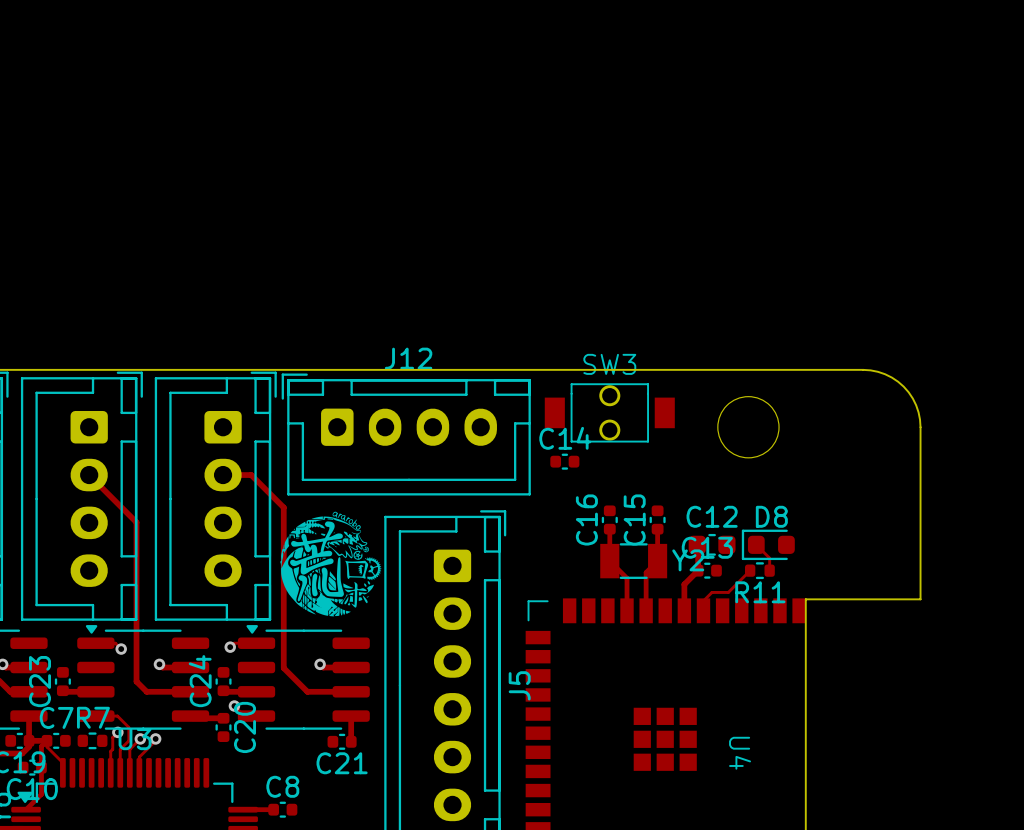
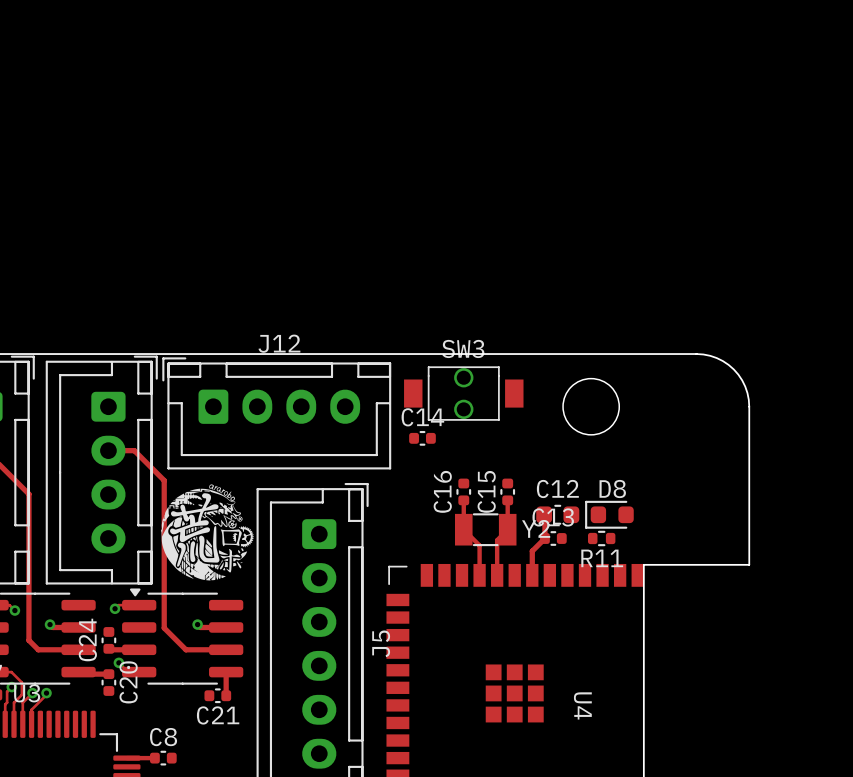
track: (756, 544) (769, 558) (769, 570) -> none
track: (750, 570) (728, 592) (711, 592) (703, 600) (703, 610) -> none

